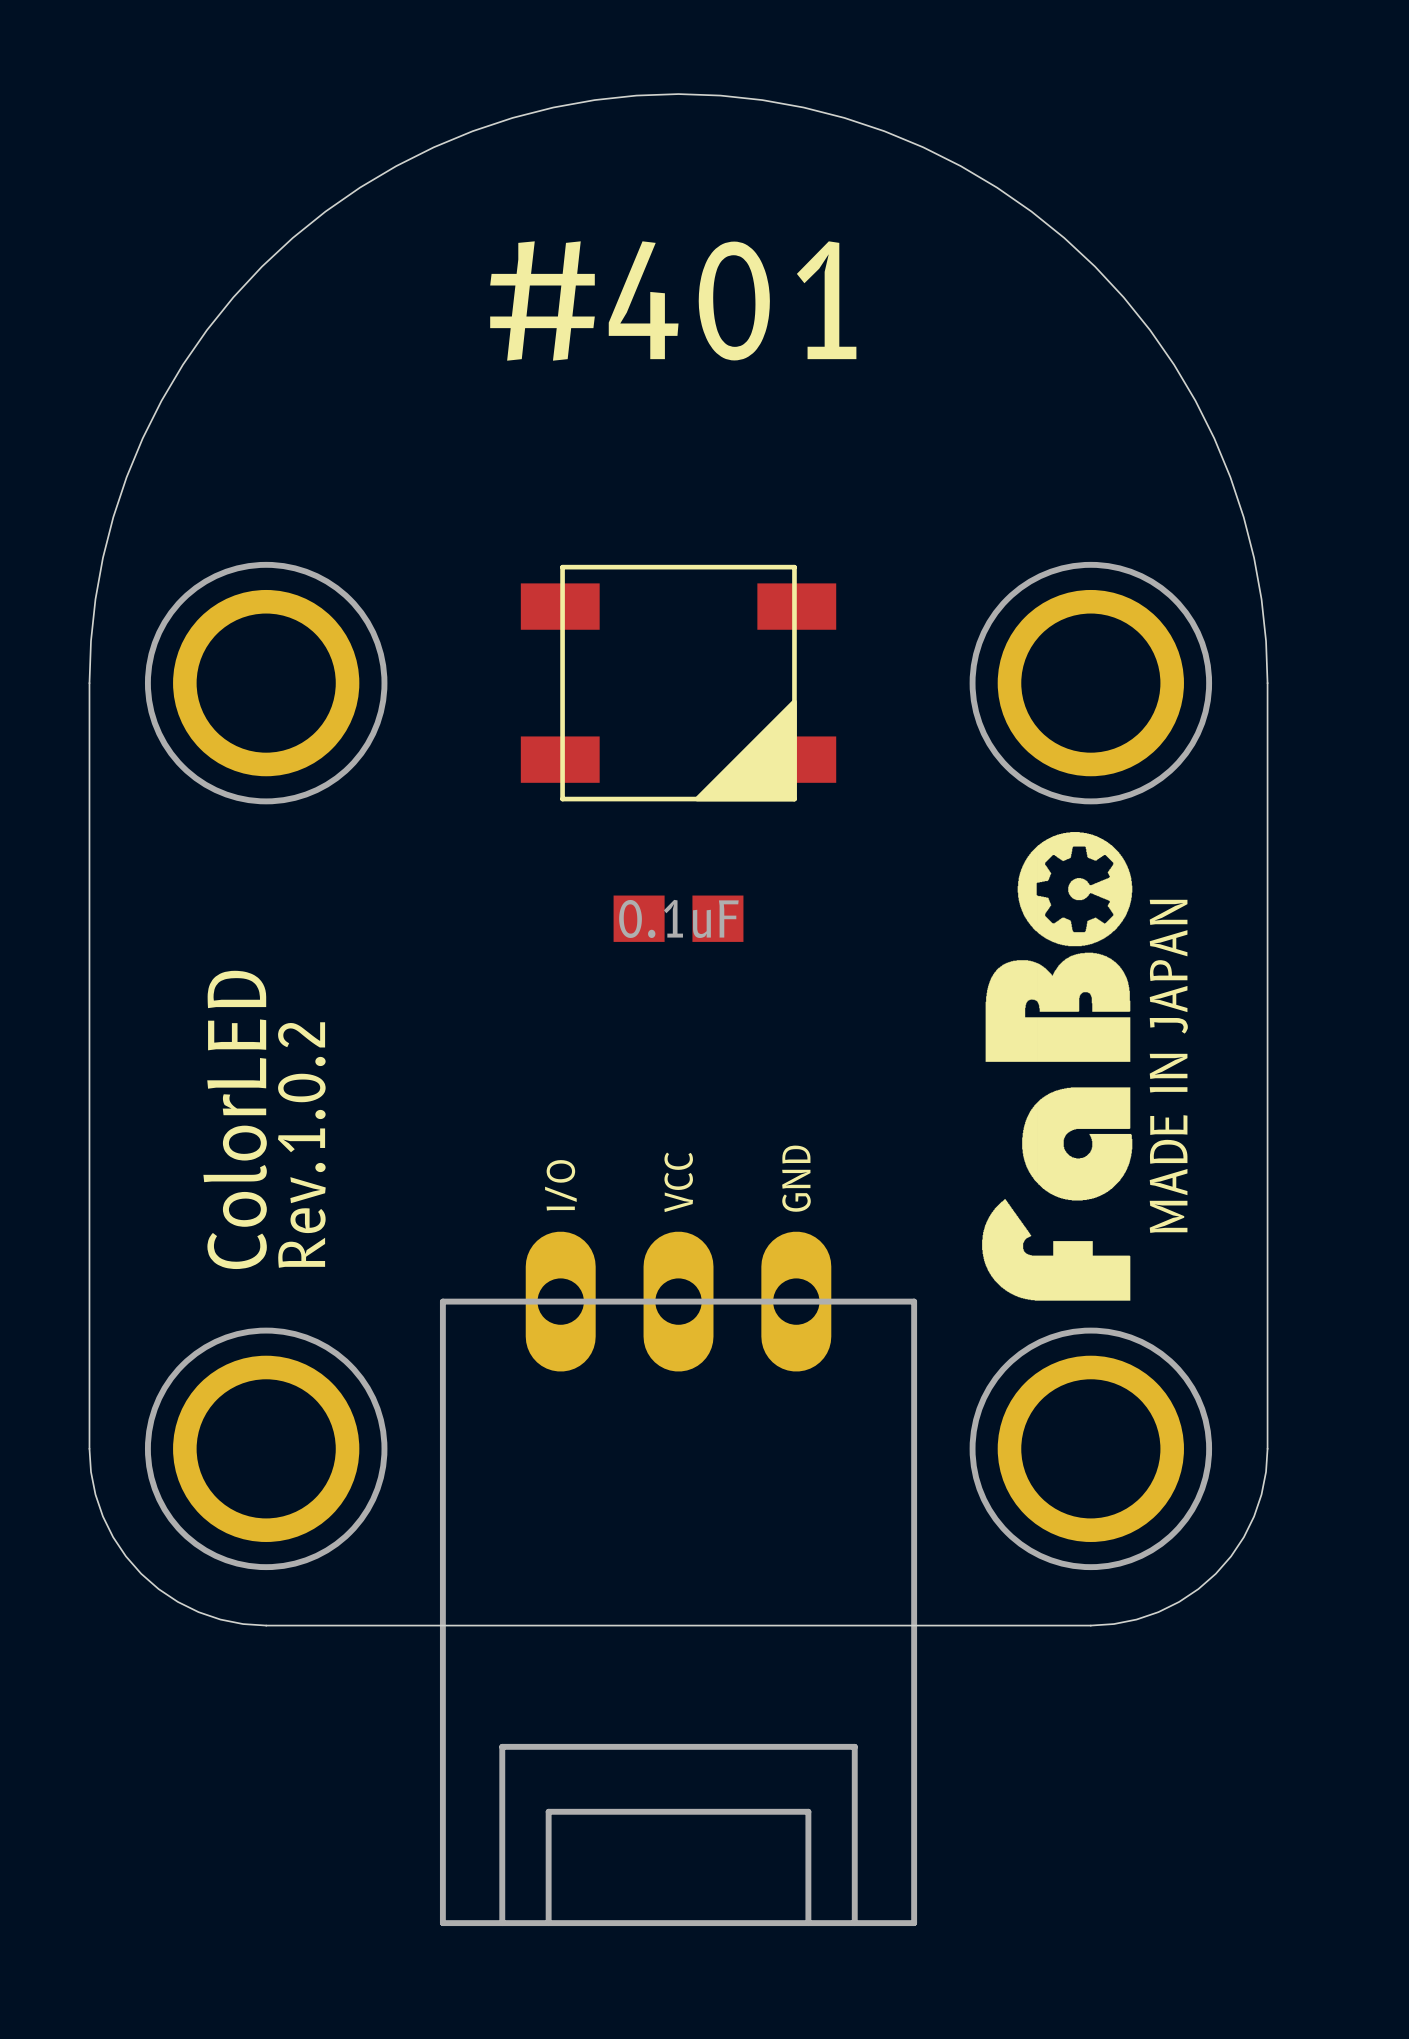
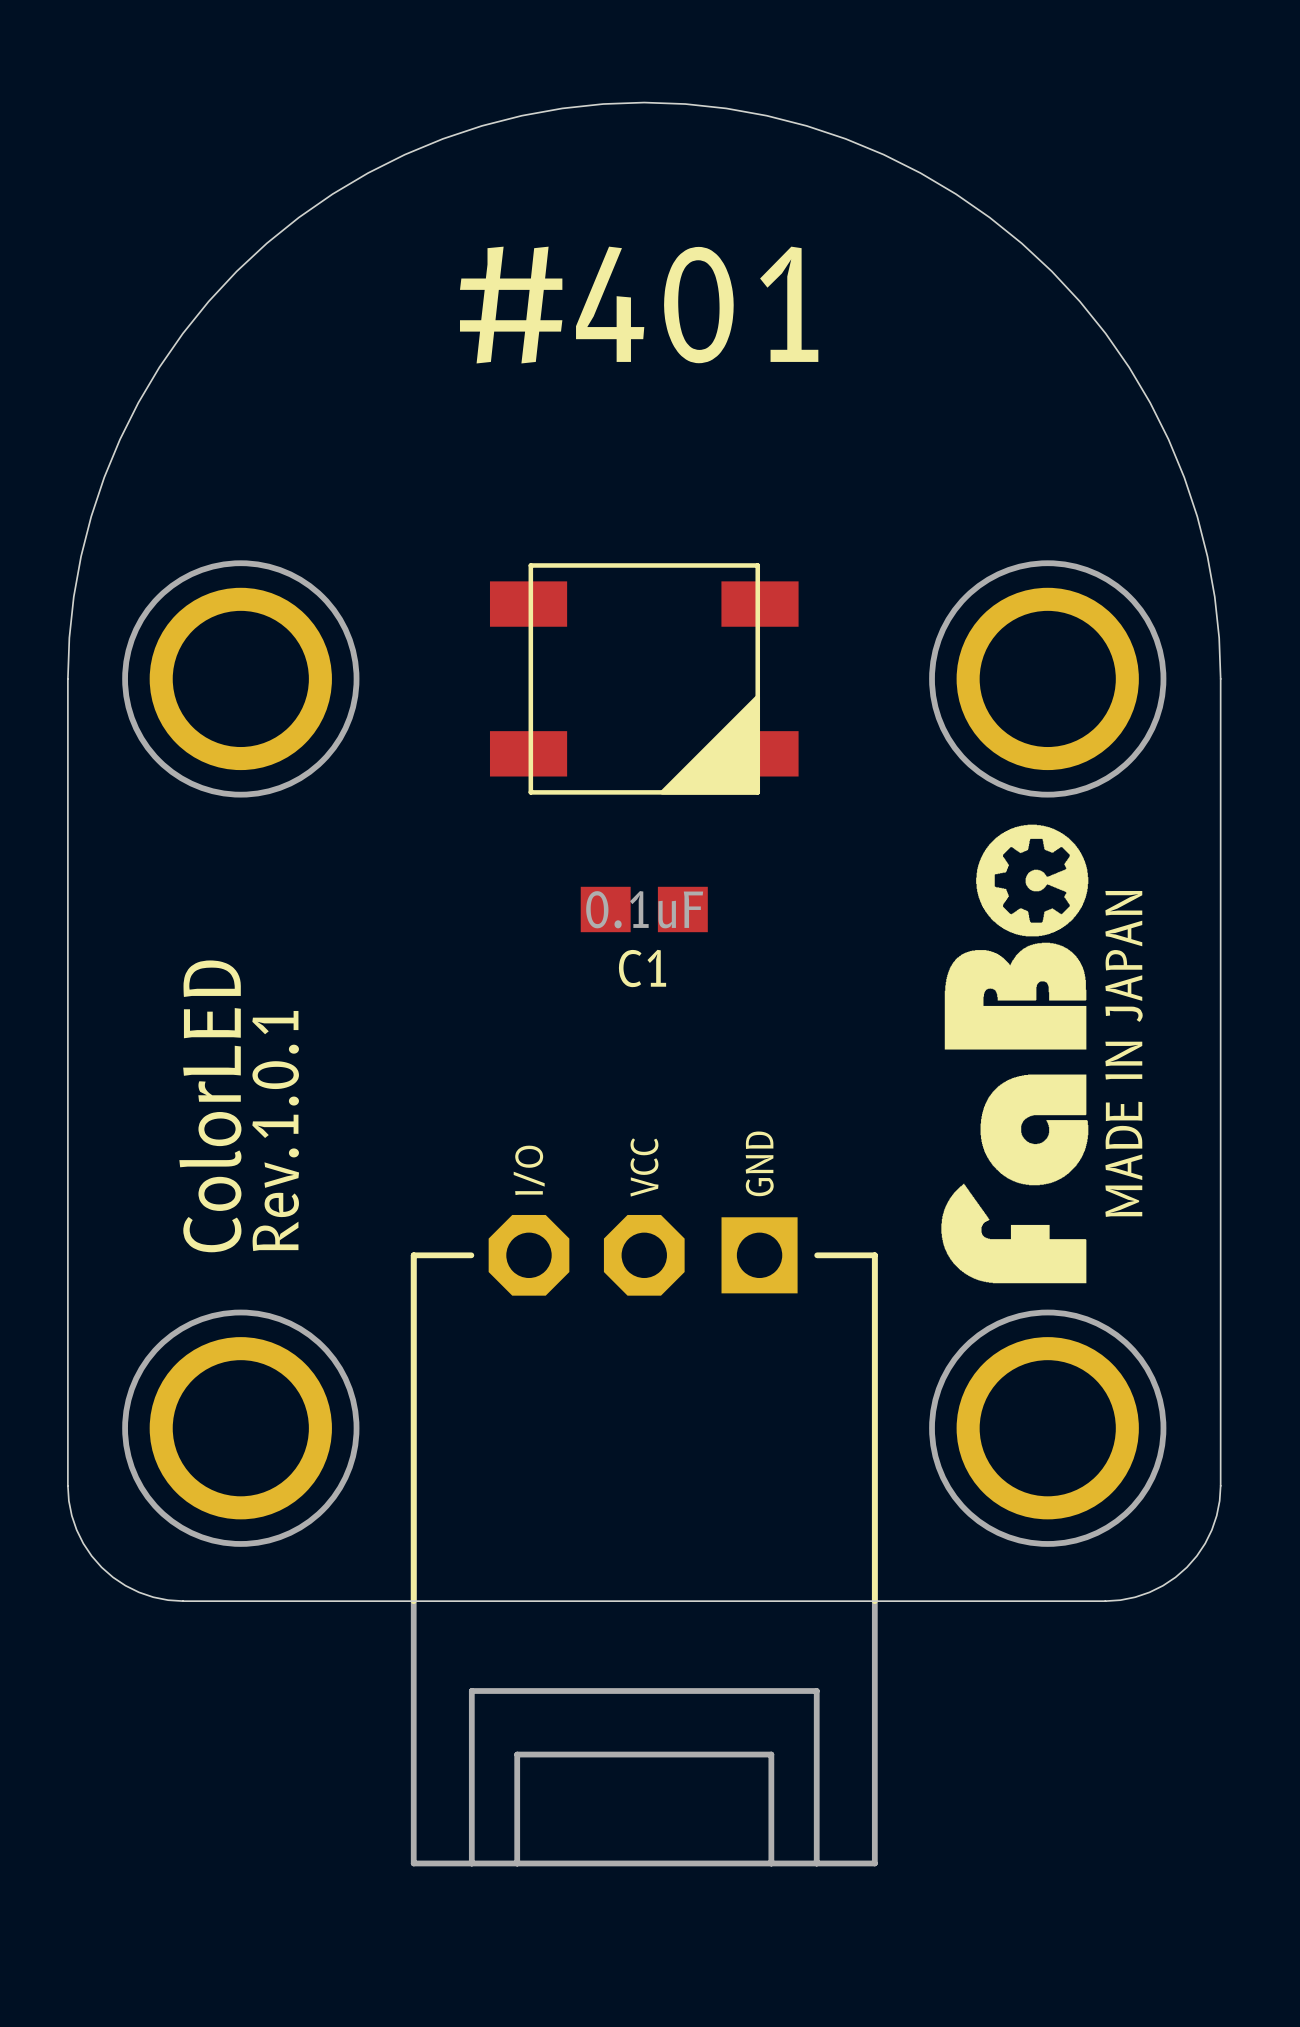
part footprint: [89, 94, 1268, 1927] -> [67, 102, 1221, 1867]
C1 name: none -> C1 (642, 968)
text: Rev.1.0.2 (301, 1145) -> Rev.1.0.1 (275, 1131)

